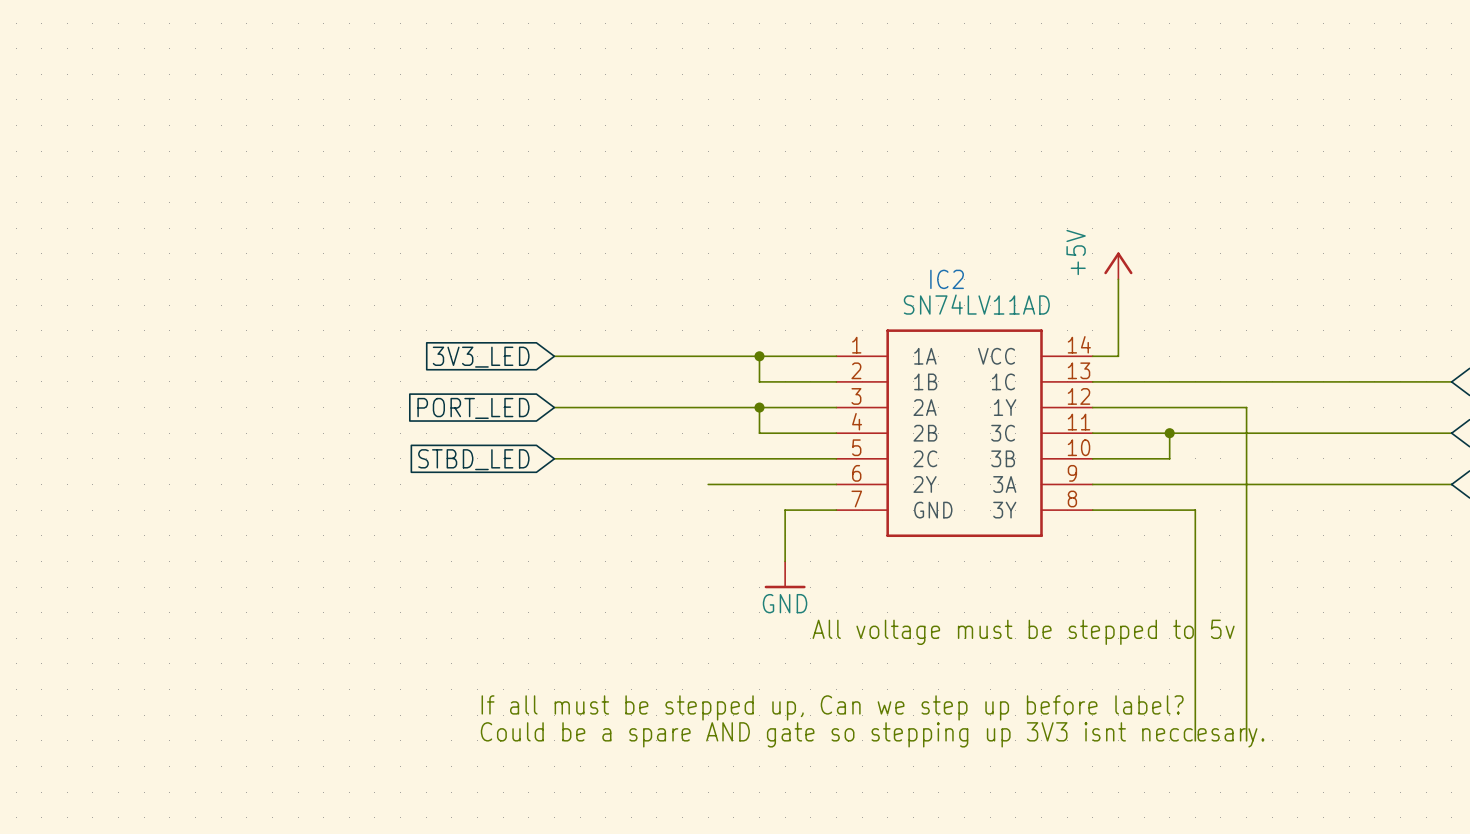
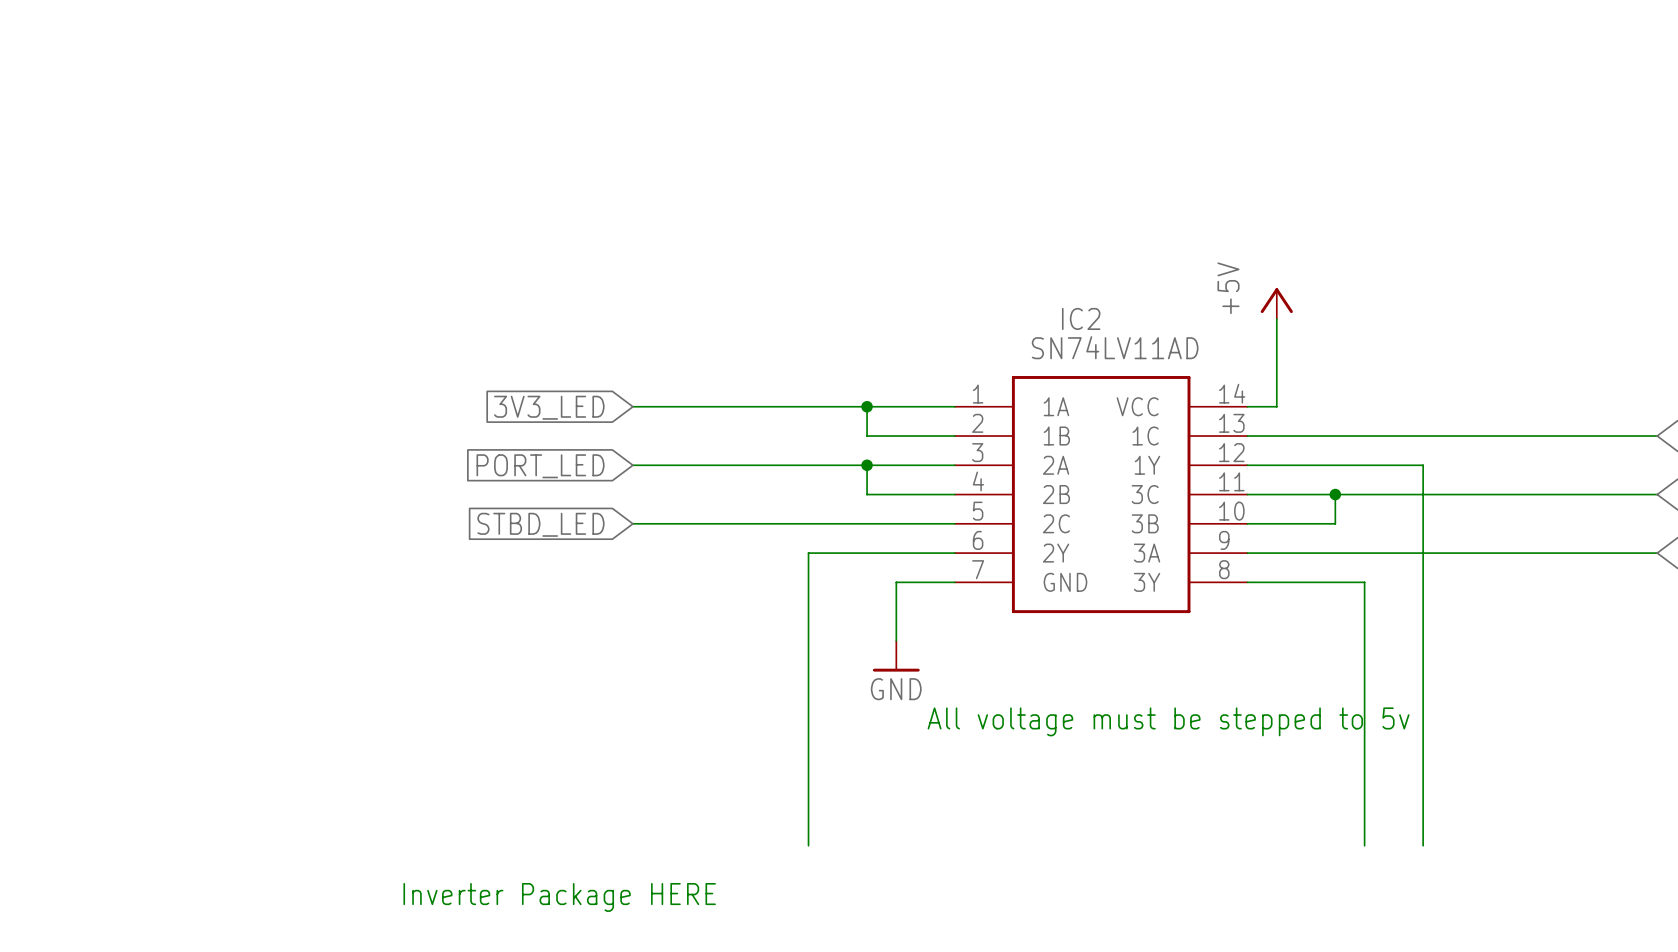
wire: none -> (808, 553) (808, 845)
text: If all must be stepped up, Can we step up before label? (832, 707) -> none
text: Could be a spare AND gate so stepping up 3V3 isnt neccesary. (872, 734) -> none
text: none -> Inverter Package HERE (559, 897)

